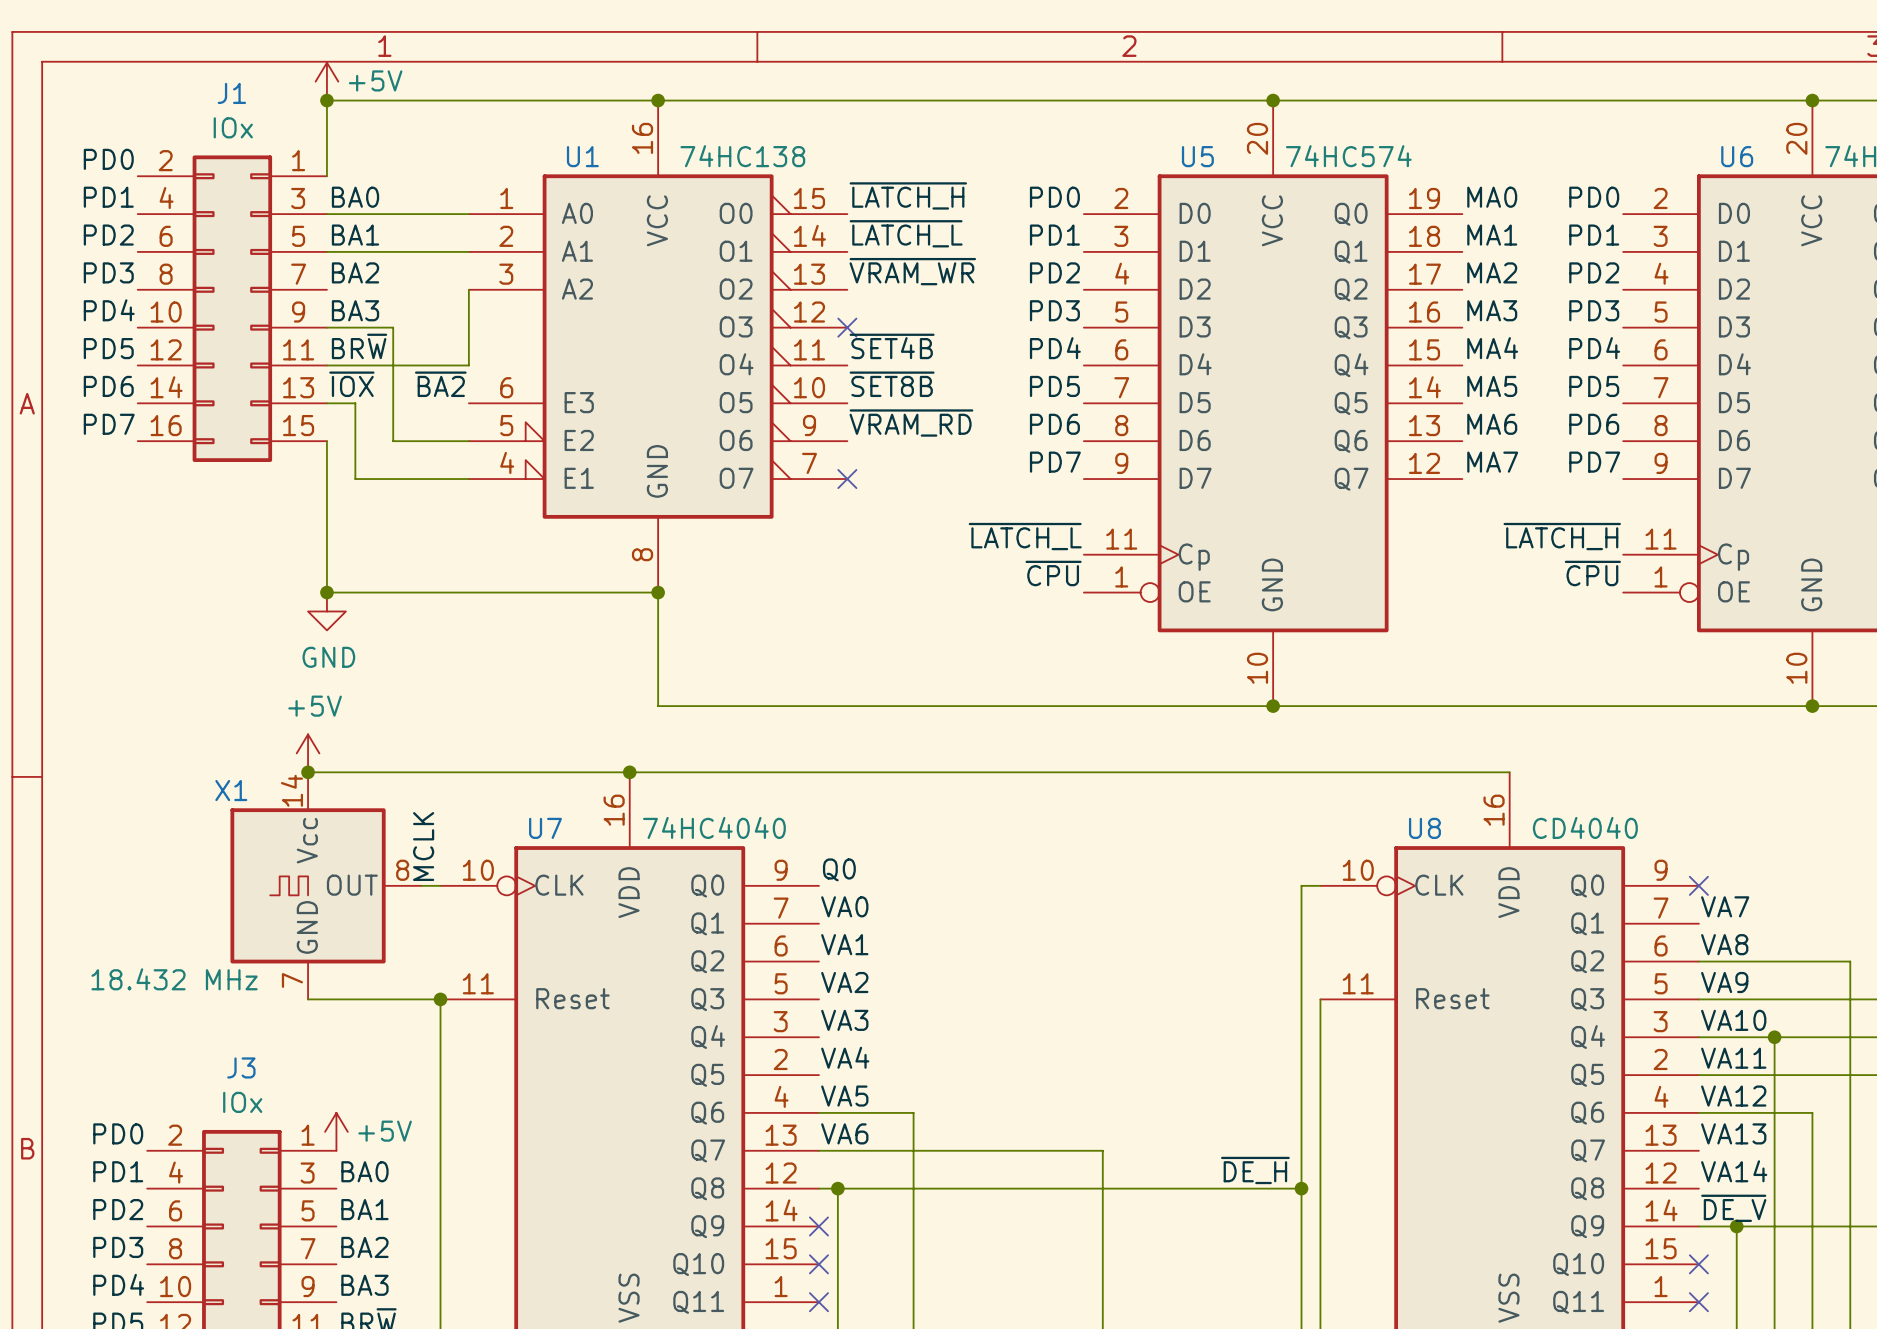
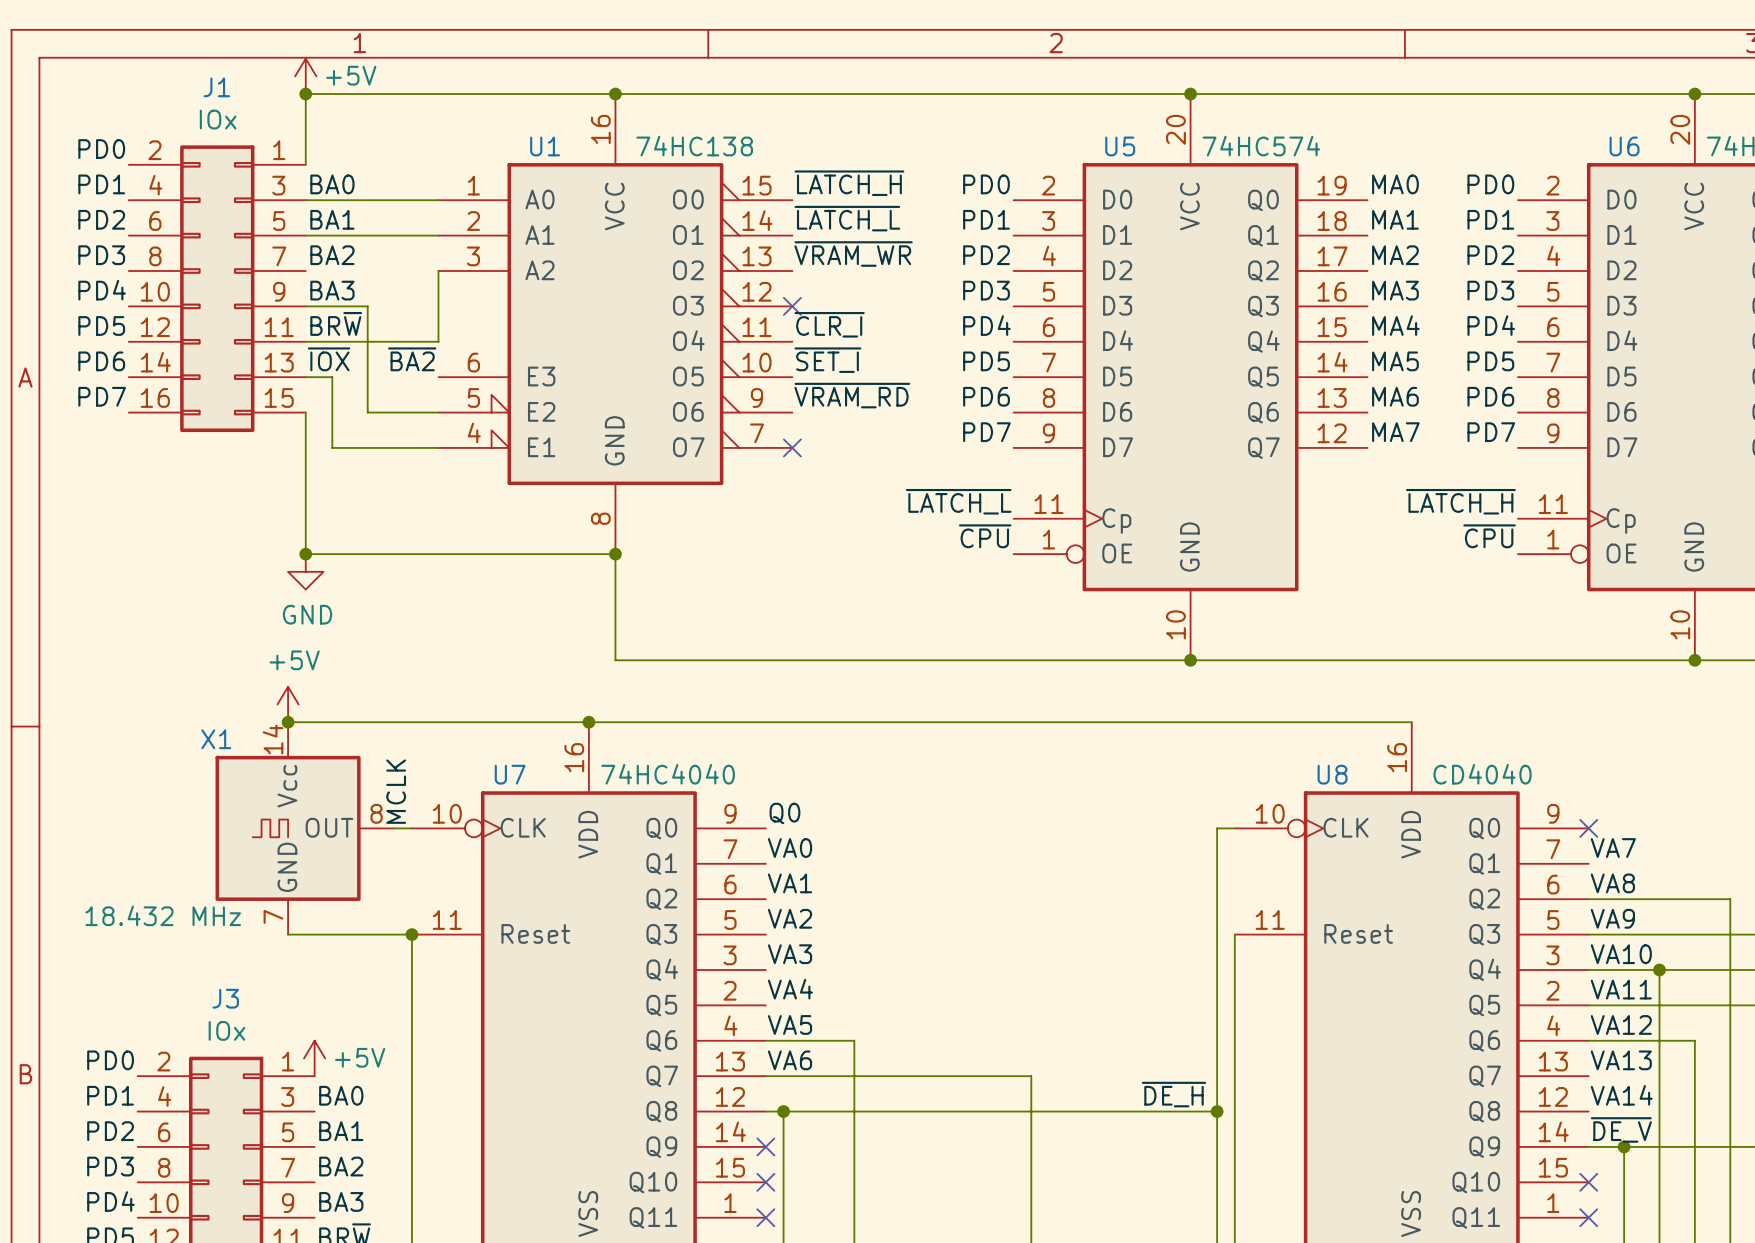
label: ~{SET4B} (892, 346) -> ~{CLR_I} (829, 324)
label: ~{SET8B} (892, 384) -> ~{SET_I} (827, 360)

